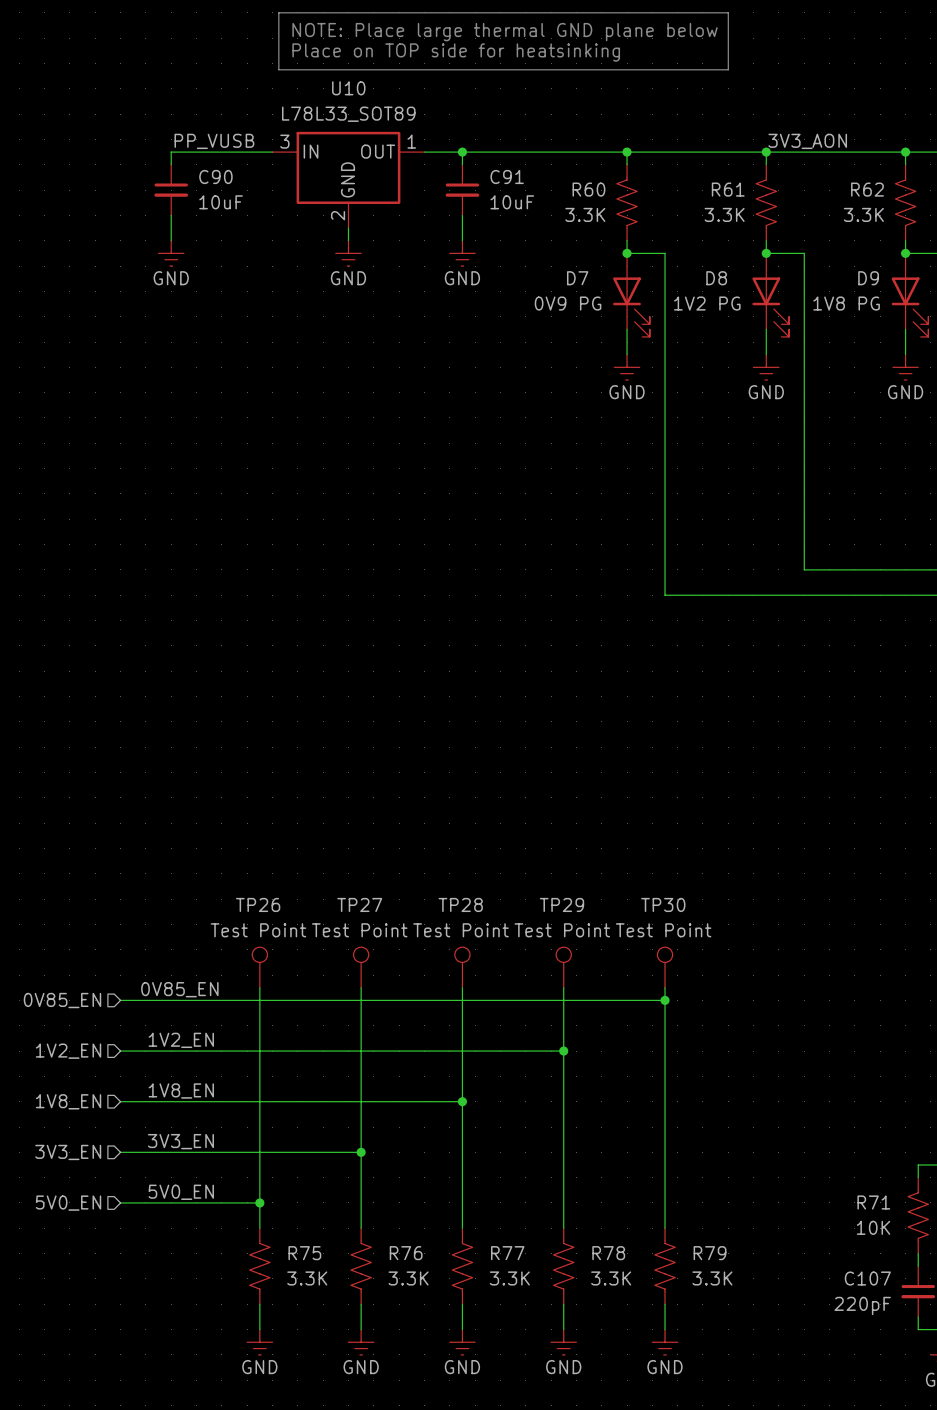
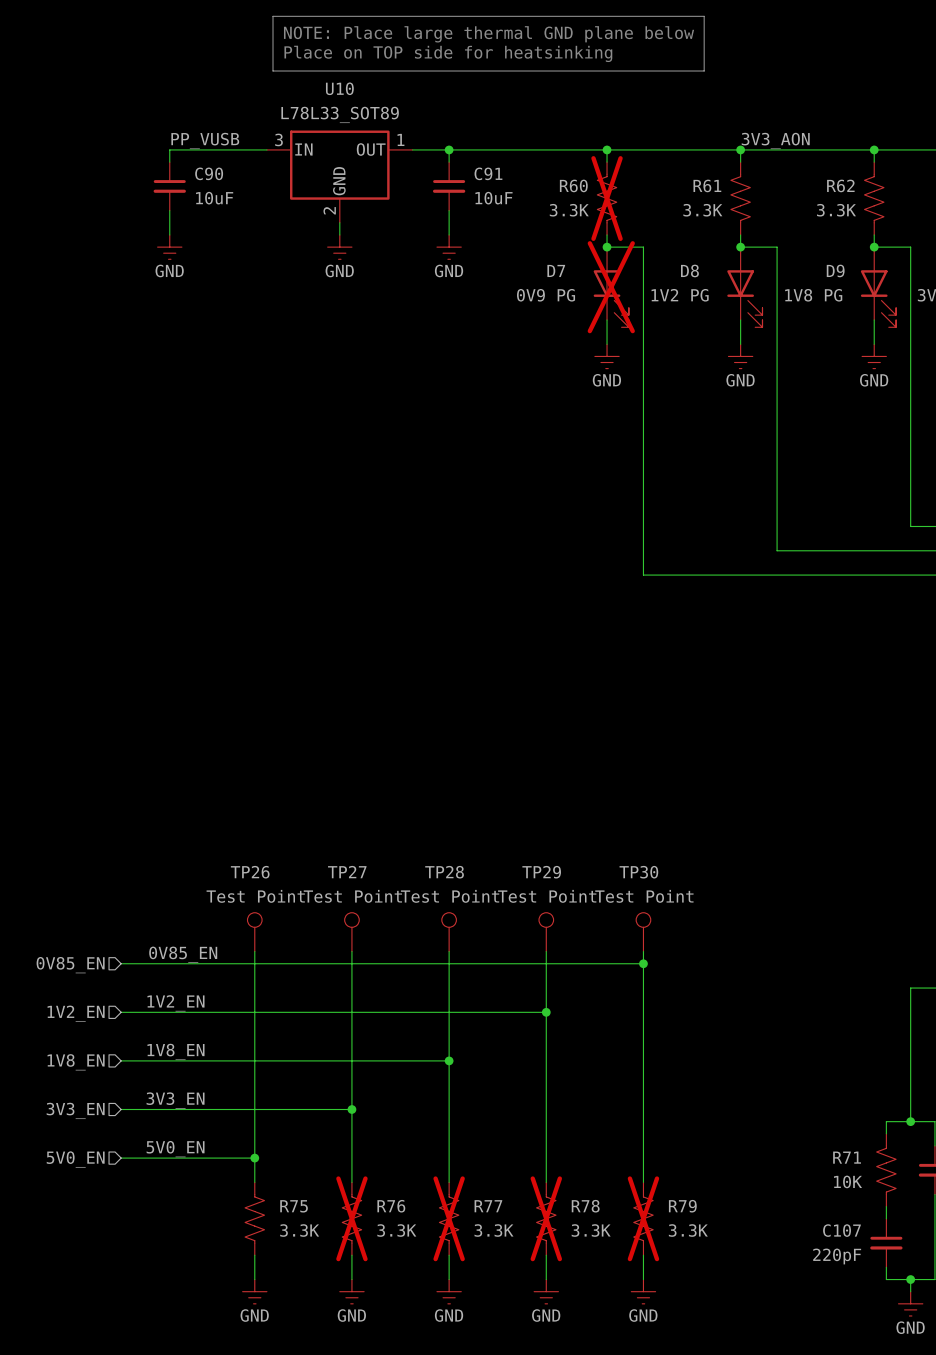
R60 do-not-place cross: none -> (607, 198)
D7 do-not-place cross: none -> (611, 287)
R76 do-not-place cross: none -> (351, 1218)
R77 do-not-place cross: none -> (449, 1218)
R78 do-not-place cross: none -> (546, 1218)
R79 do-not-place cross: none -> (643, 1218)

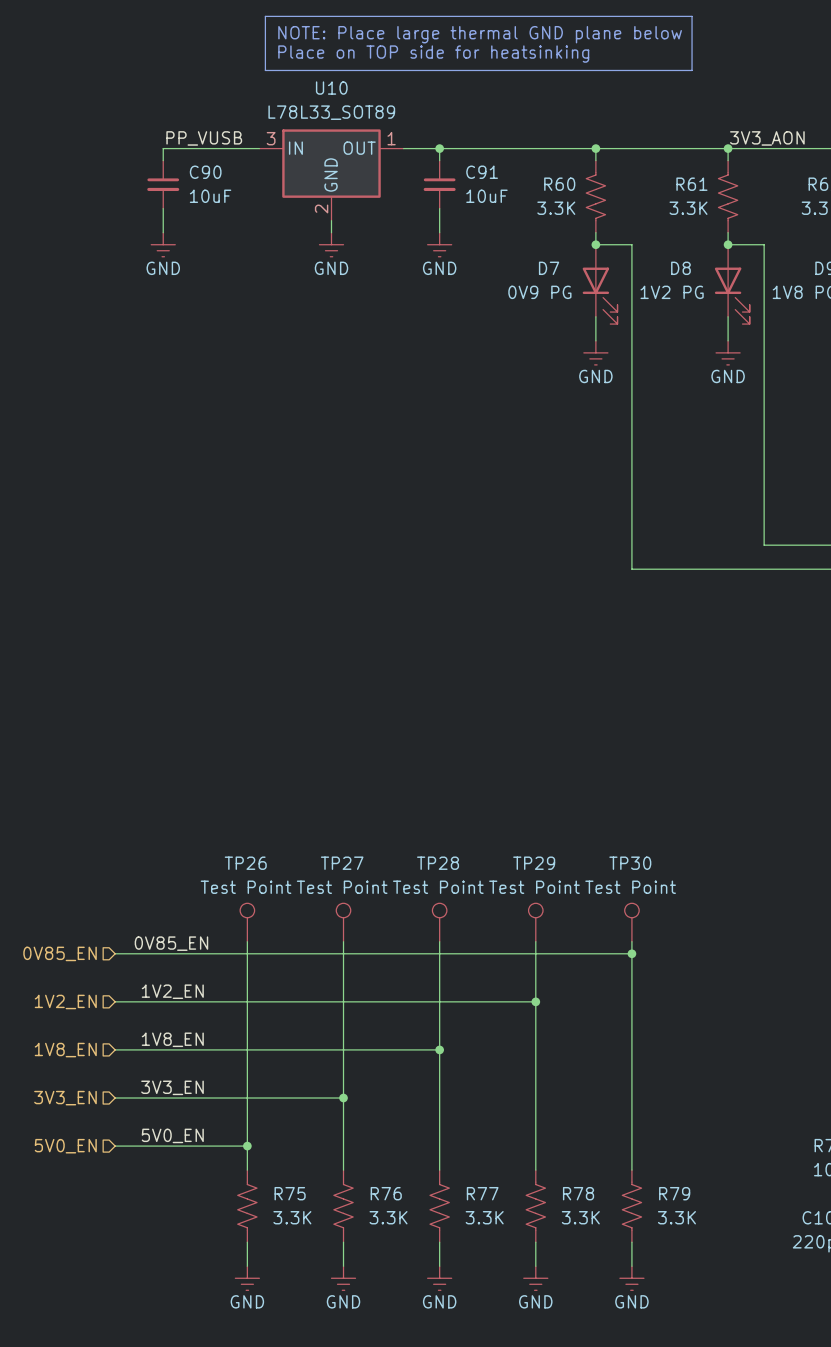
R60 do-not-place cross: (607, 198) -> none
D7 do-not-place cross: (611, 287) -> none
R76 do-not-place cross: (351, 1218) -> none
R77 do-not-place cross: (449, 1218) -> none
R78 do-not-place cross: (546, 1218) -> none
R79 do-not-place cross: (643, 1218) -> none

